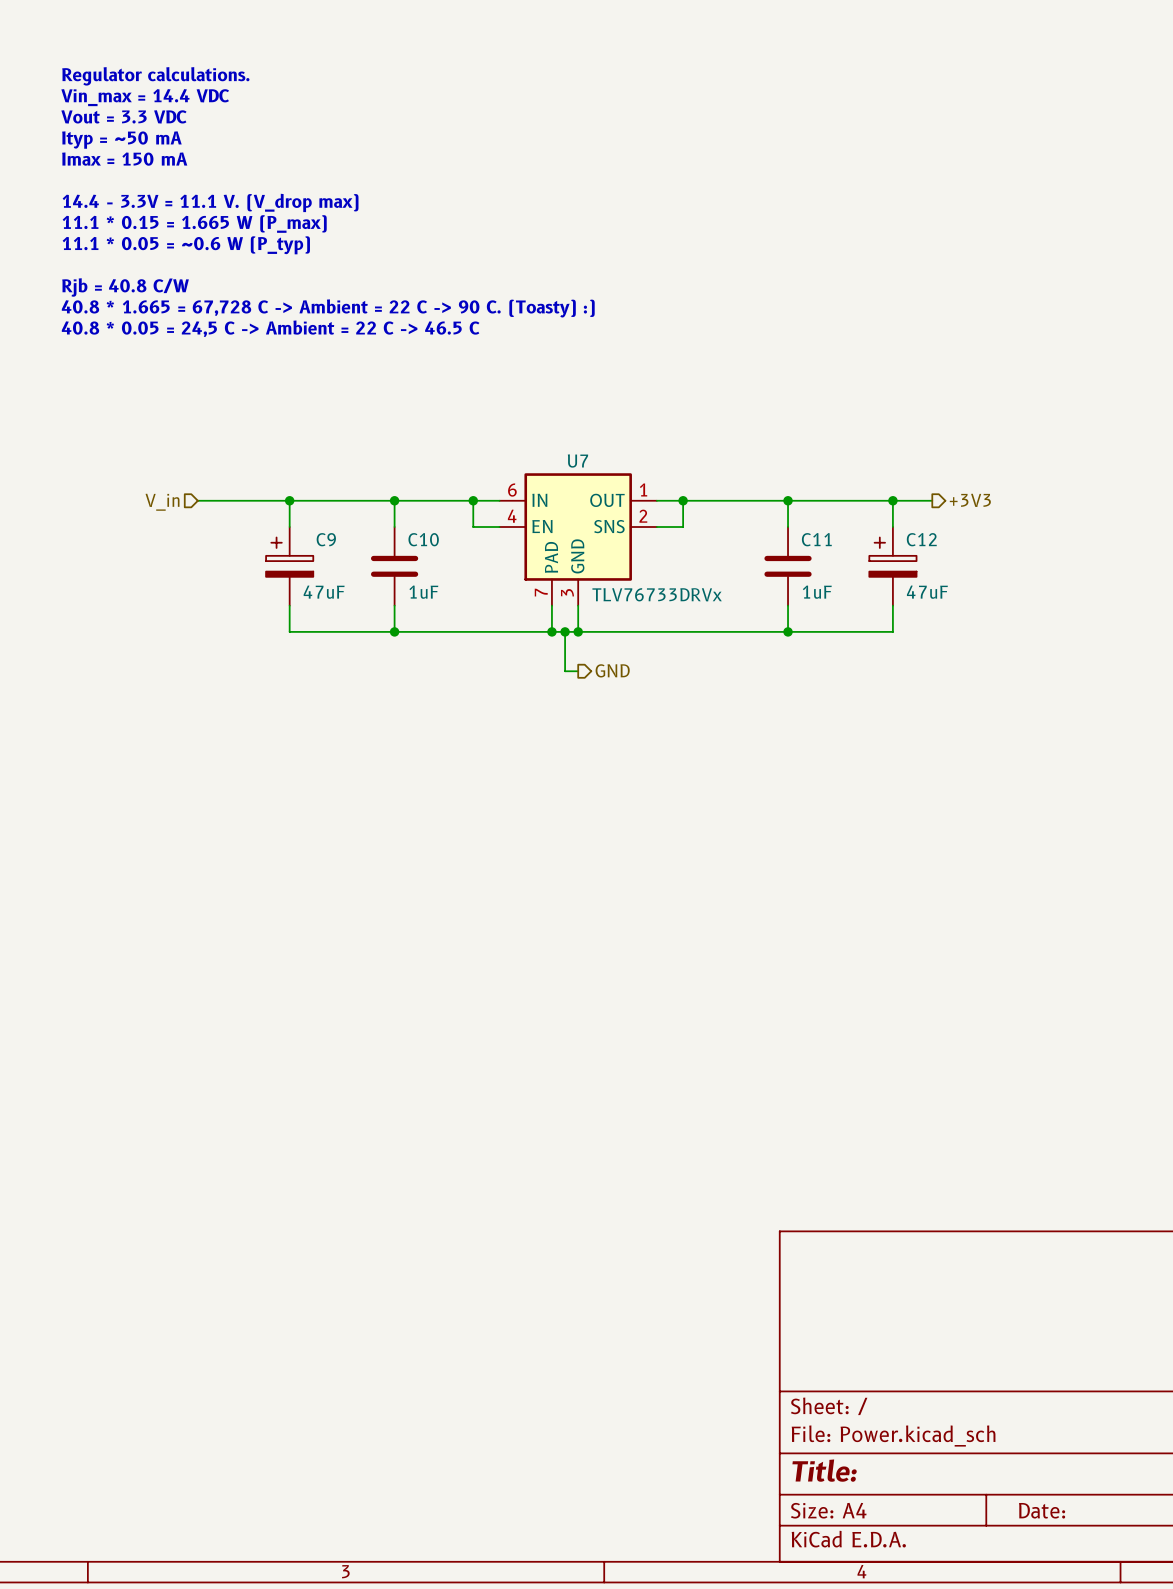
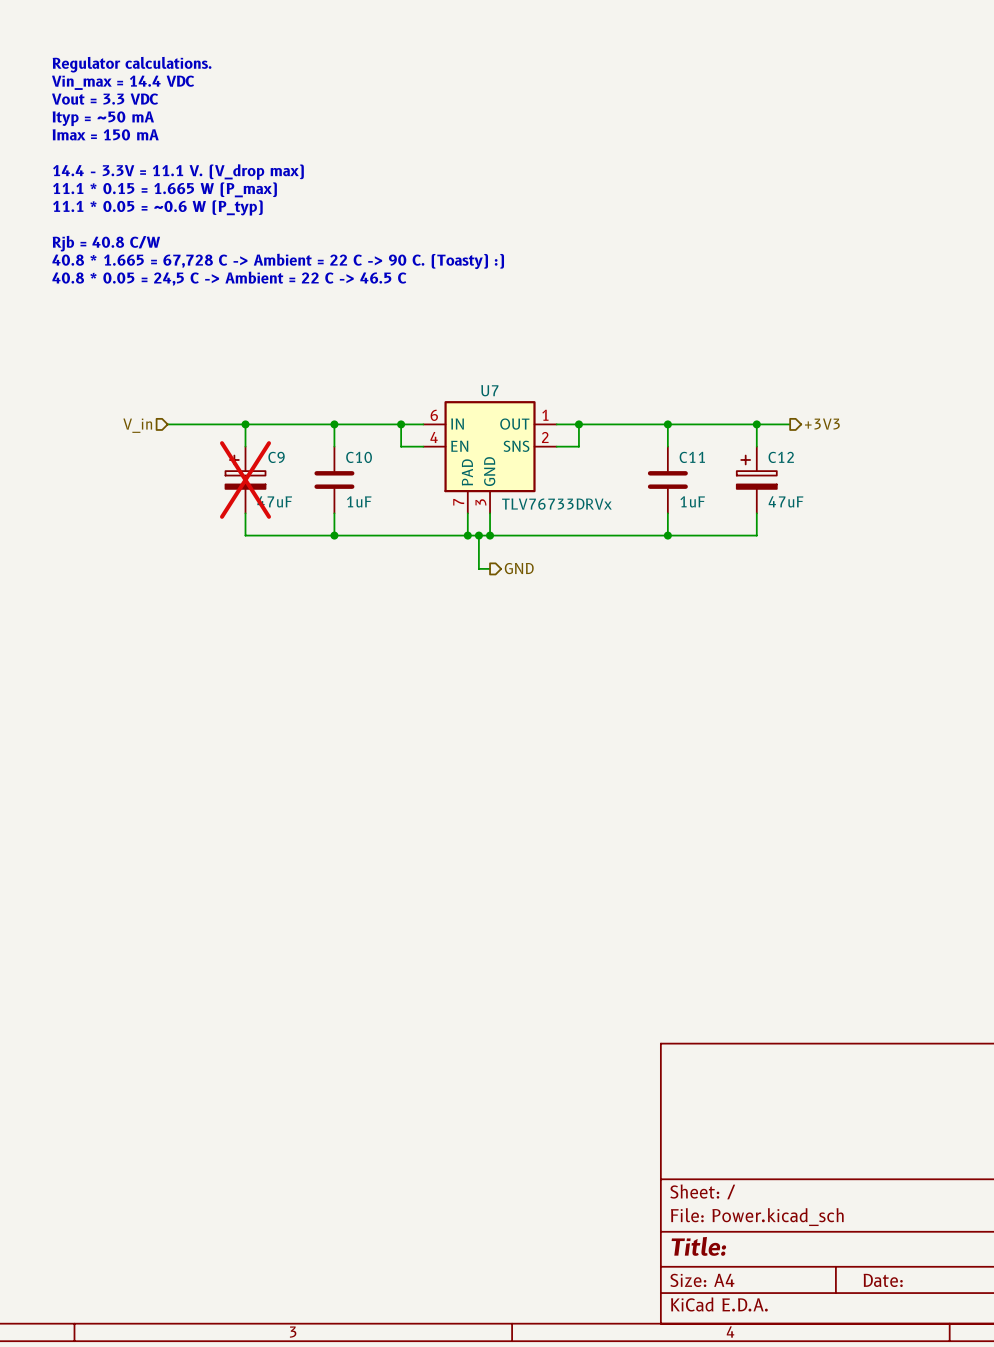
C9 do-not-place cross: none -> (245, 479)

